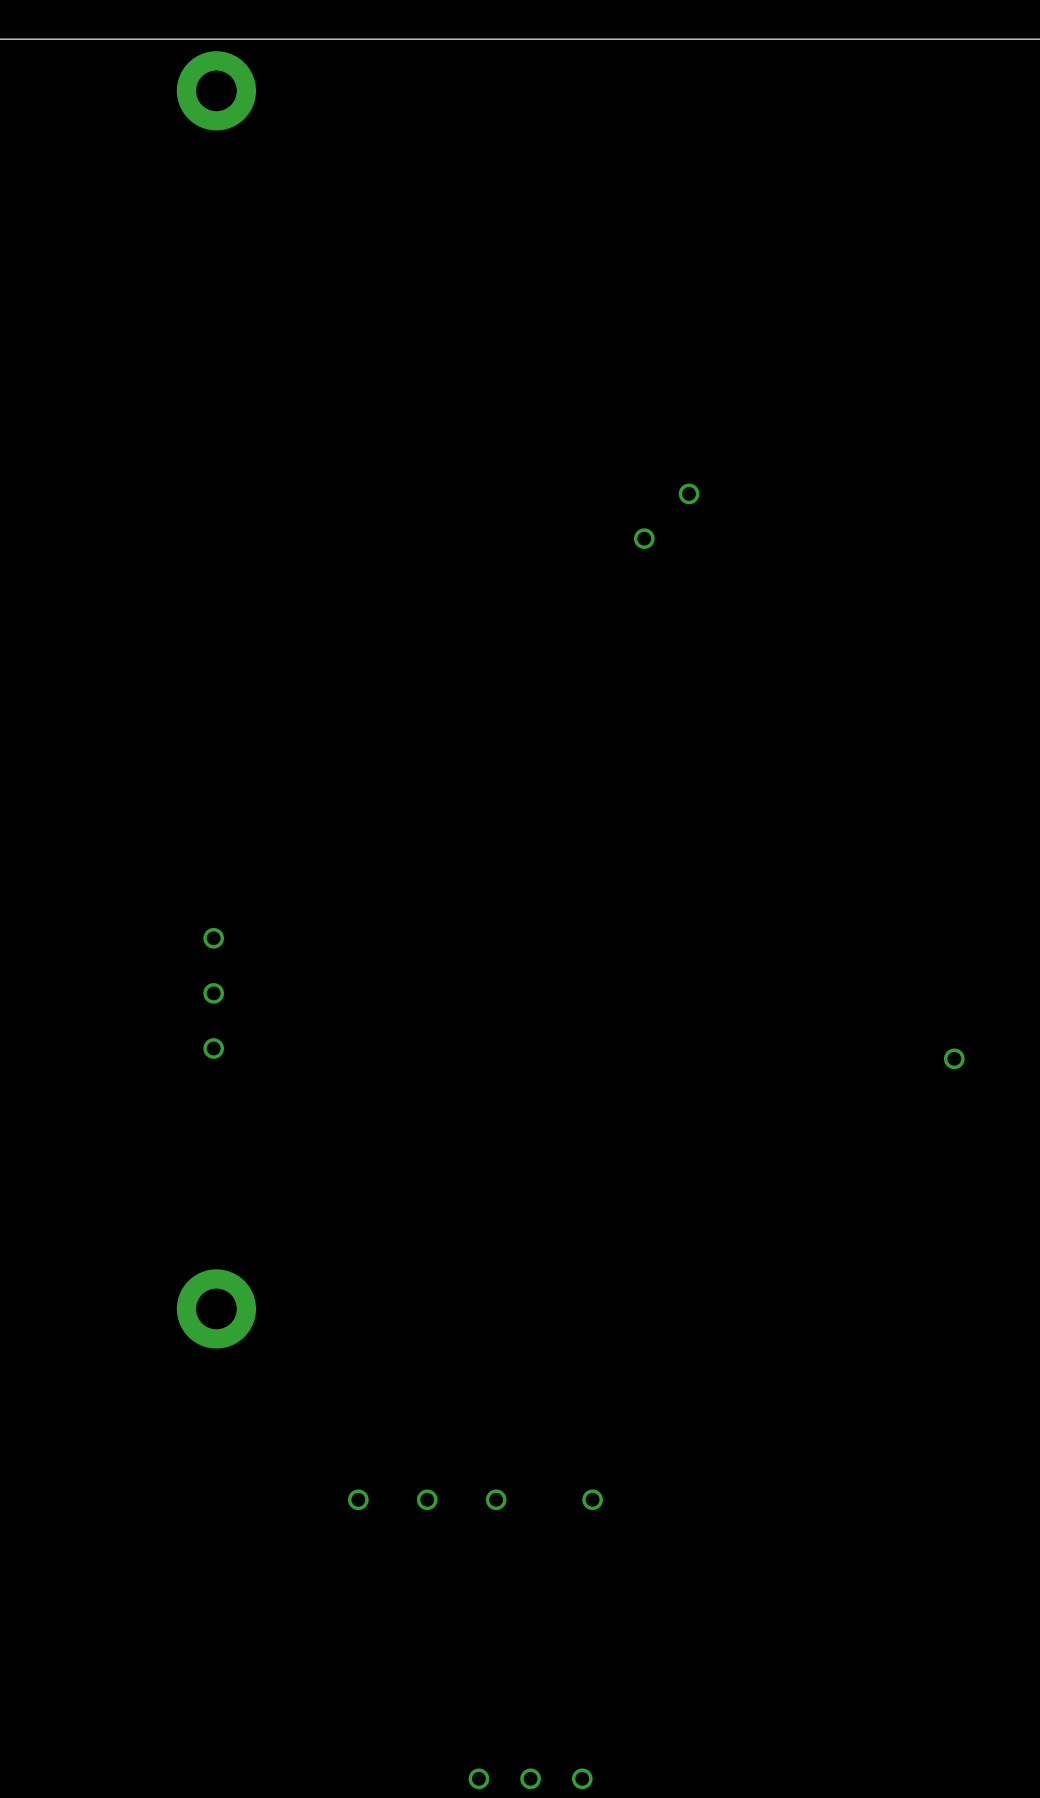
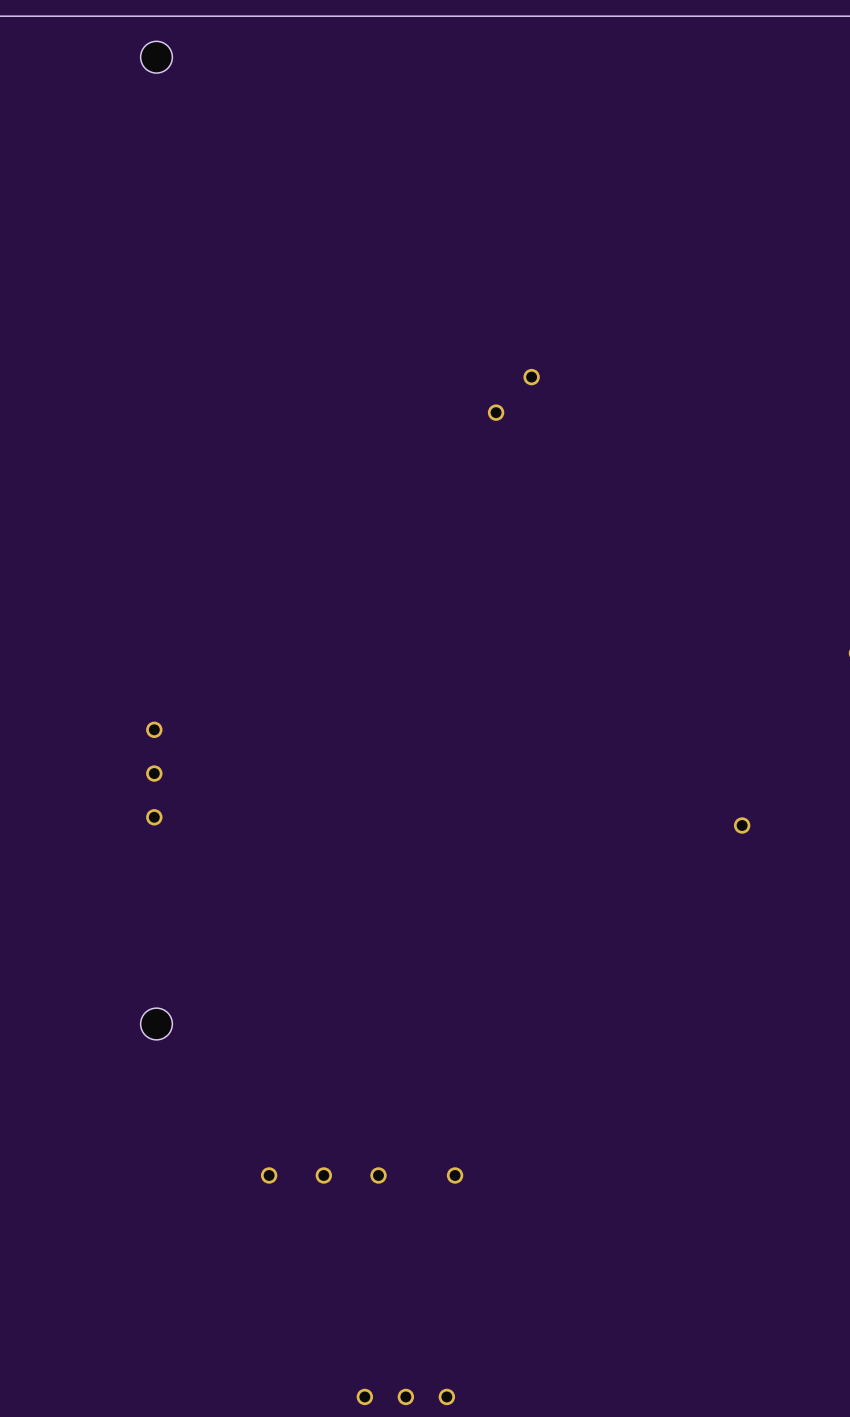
part: (216, 90) -> none
hole: none -> (156, 57)
part: (216, 1308) -> none
hole: none -> (156, 1024)

